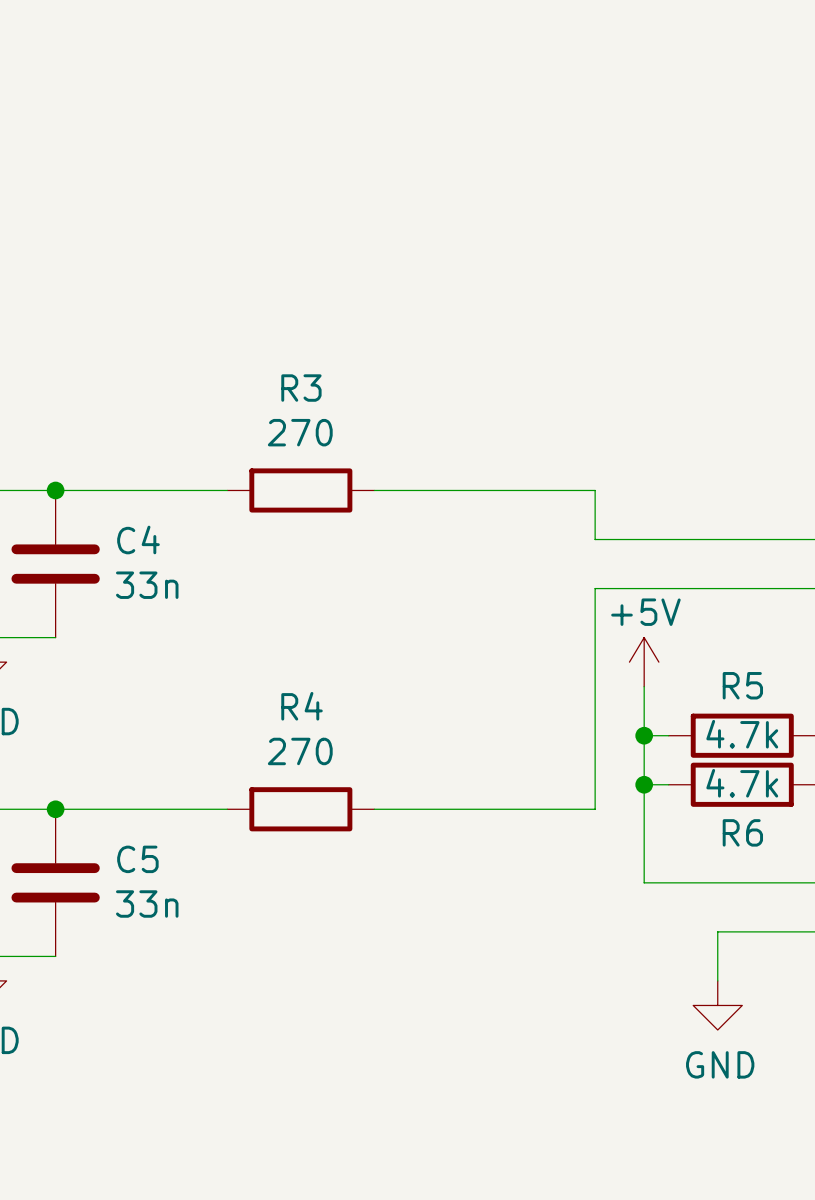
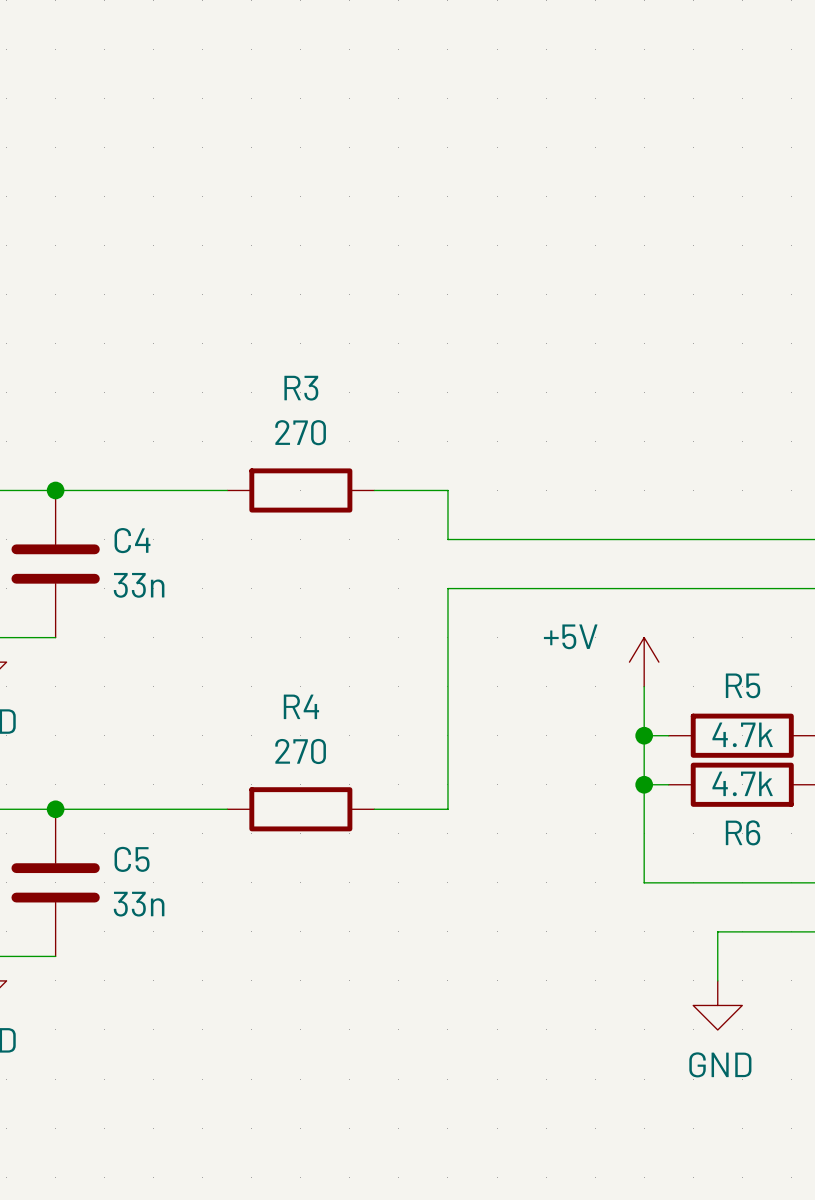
wire: (447, 490) (595, 490) (595, 539) -> (447, 490) (447, 539) (595, 539)
wire: (595, 588) (595, 809) (447, 809) -> (595, 588) (447, 588) (447, 809)
power symbol text position: +5V (645, 612) -> +5V (570, 636)

